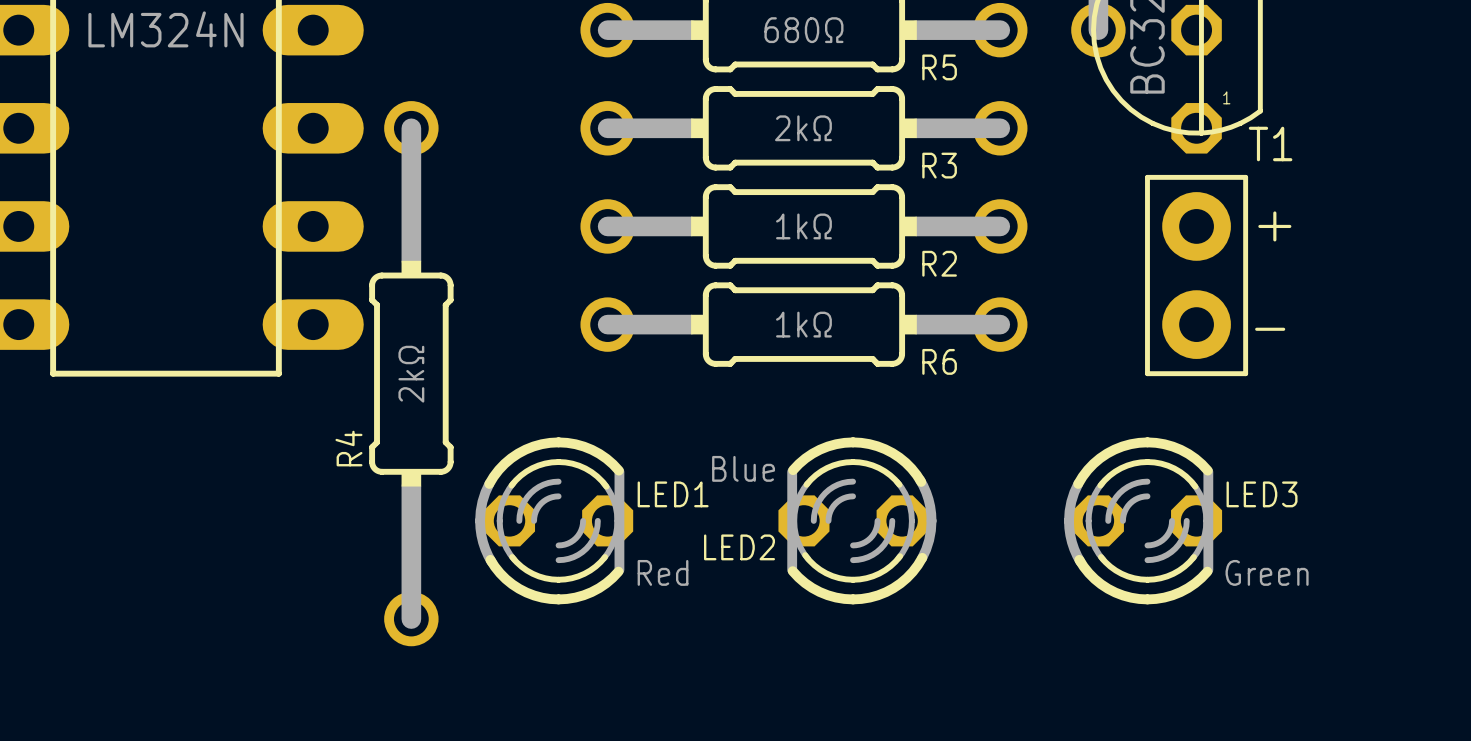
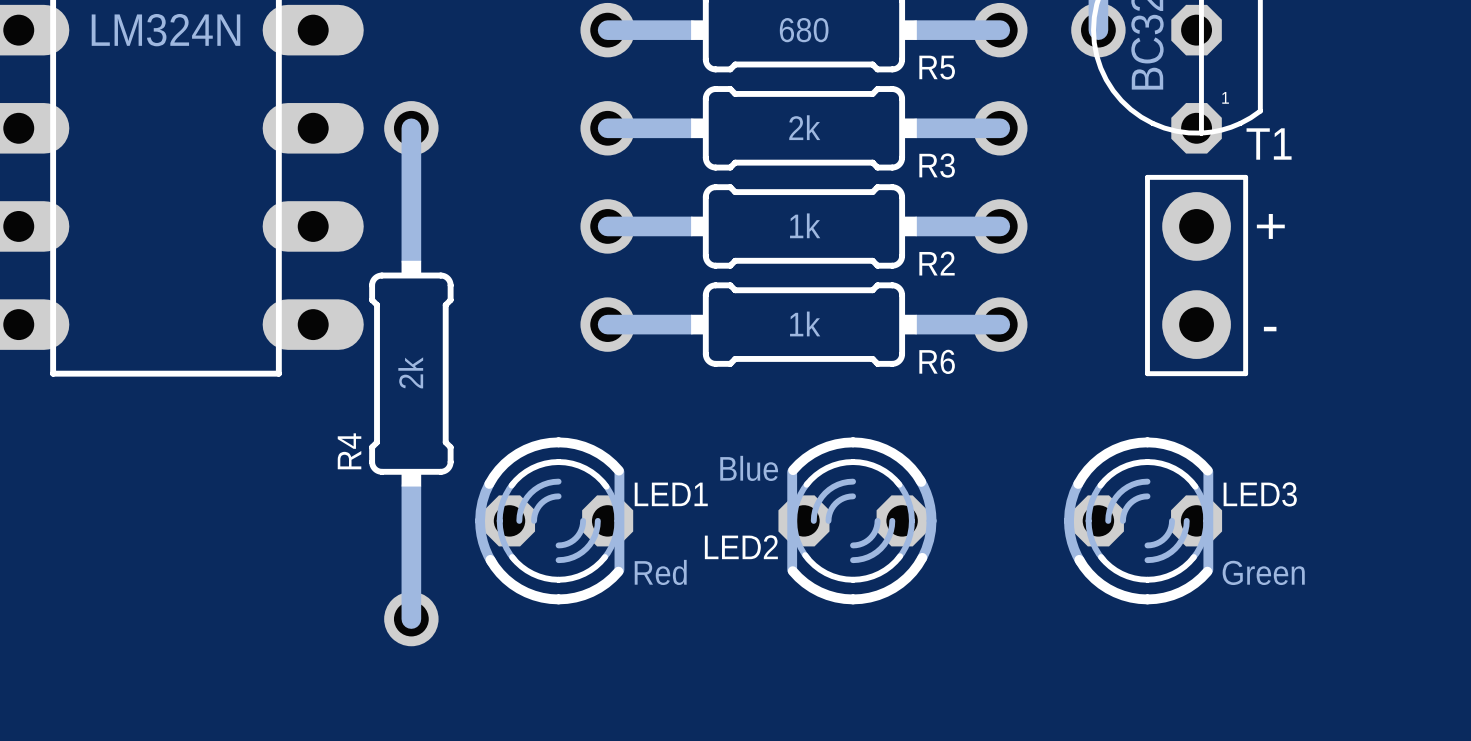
R5 value: 680Ω (803, 30) -> 680 (804, 30)
R3 value: 2kΩ (803, 128) -> 2k (804, 127)
R2 value: 1kΩ (803, 226) -> 1k (805, 225)
R6 value: 1kΩ (803, 324) -> 1k (805, 323)
R4 value: 2kΩ (411, 374) -> 2k (410, 372)

